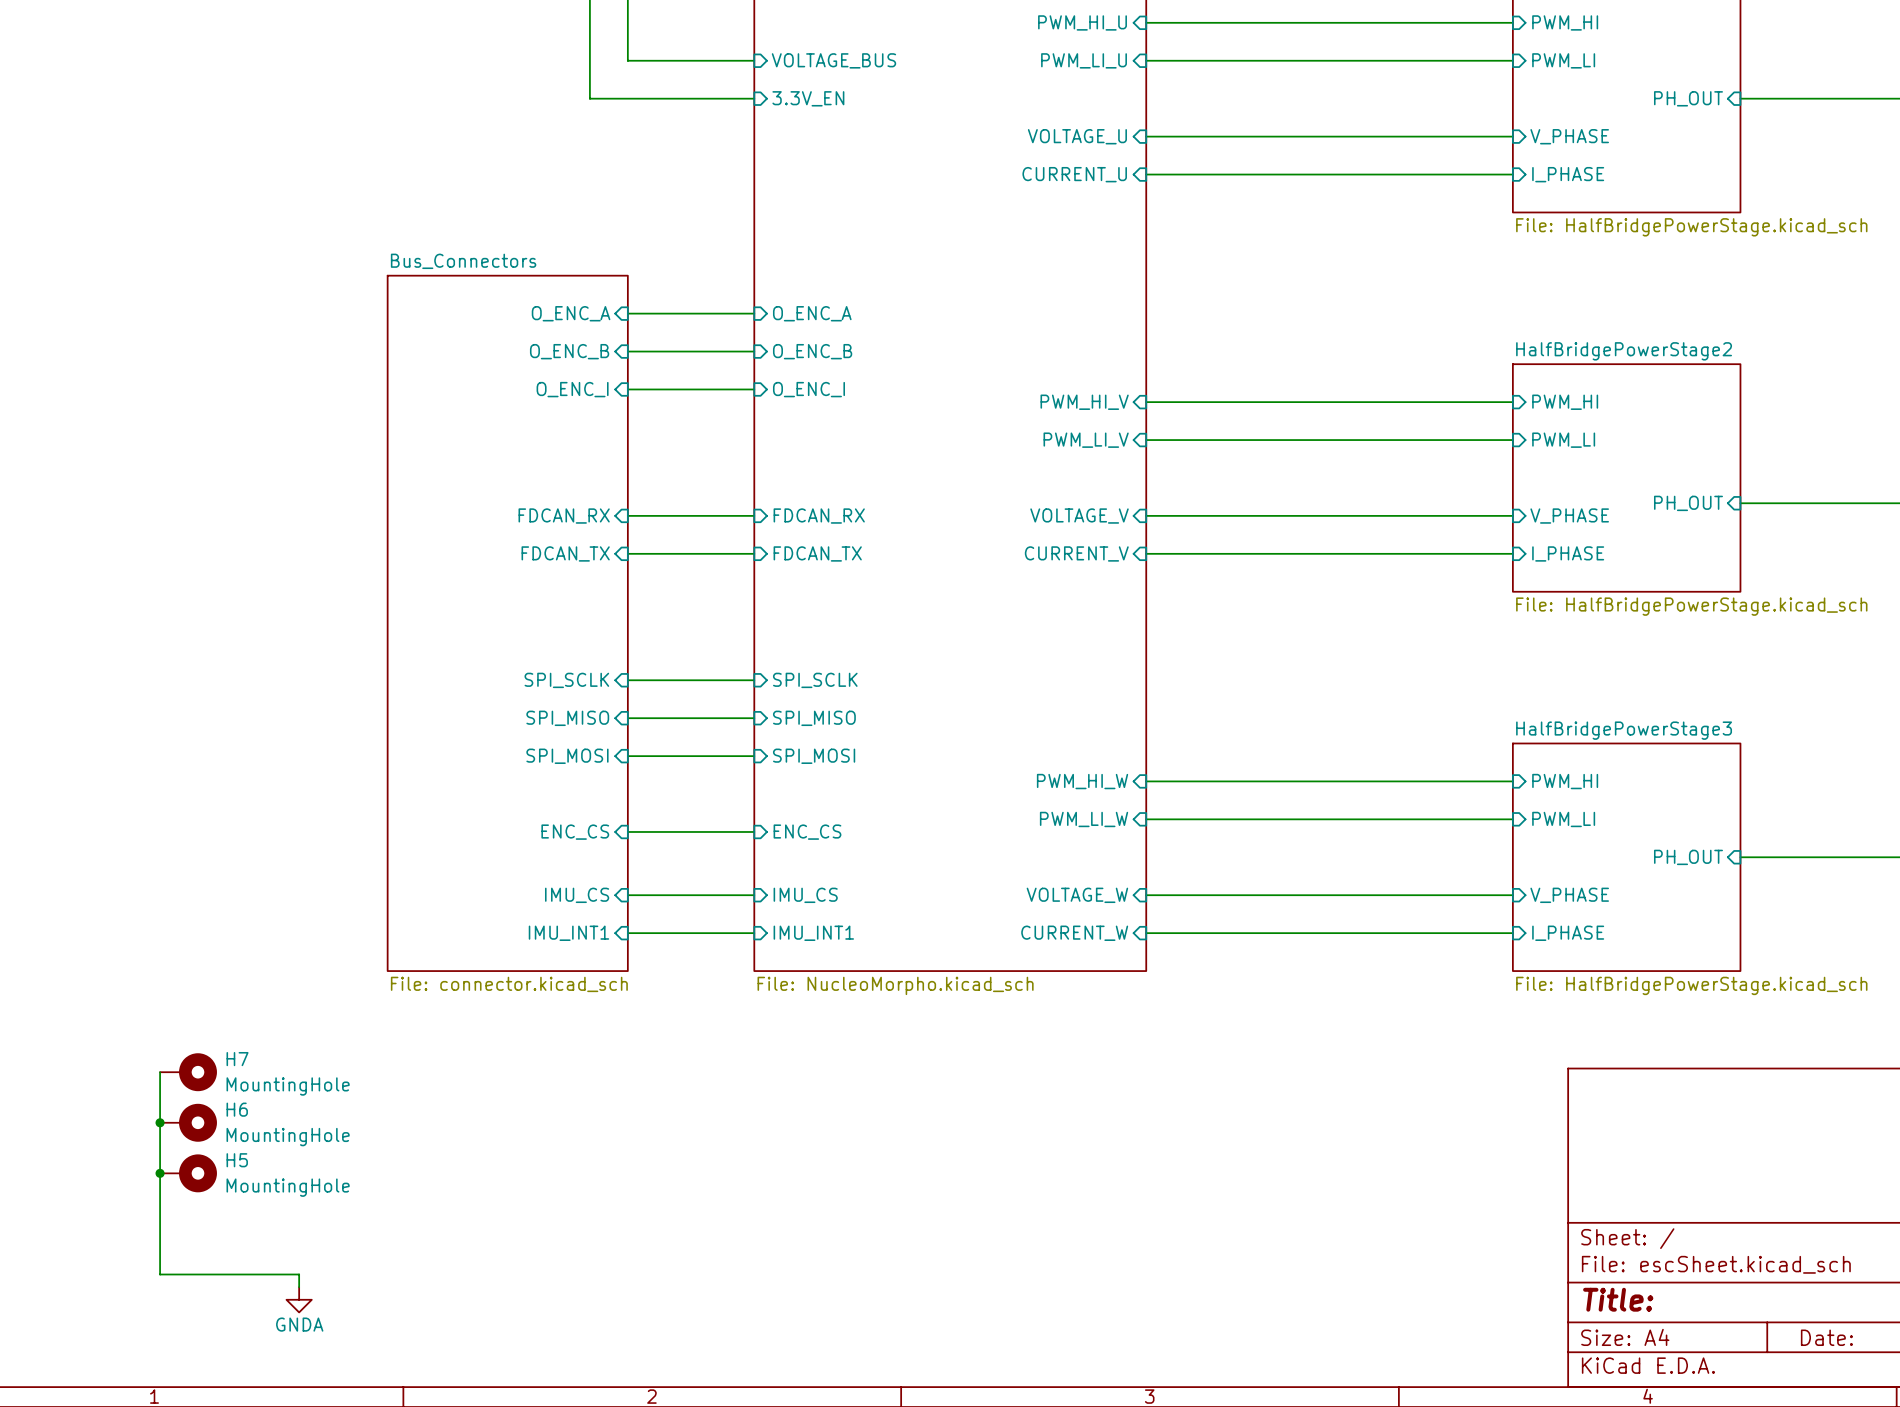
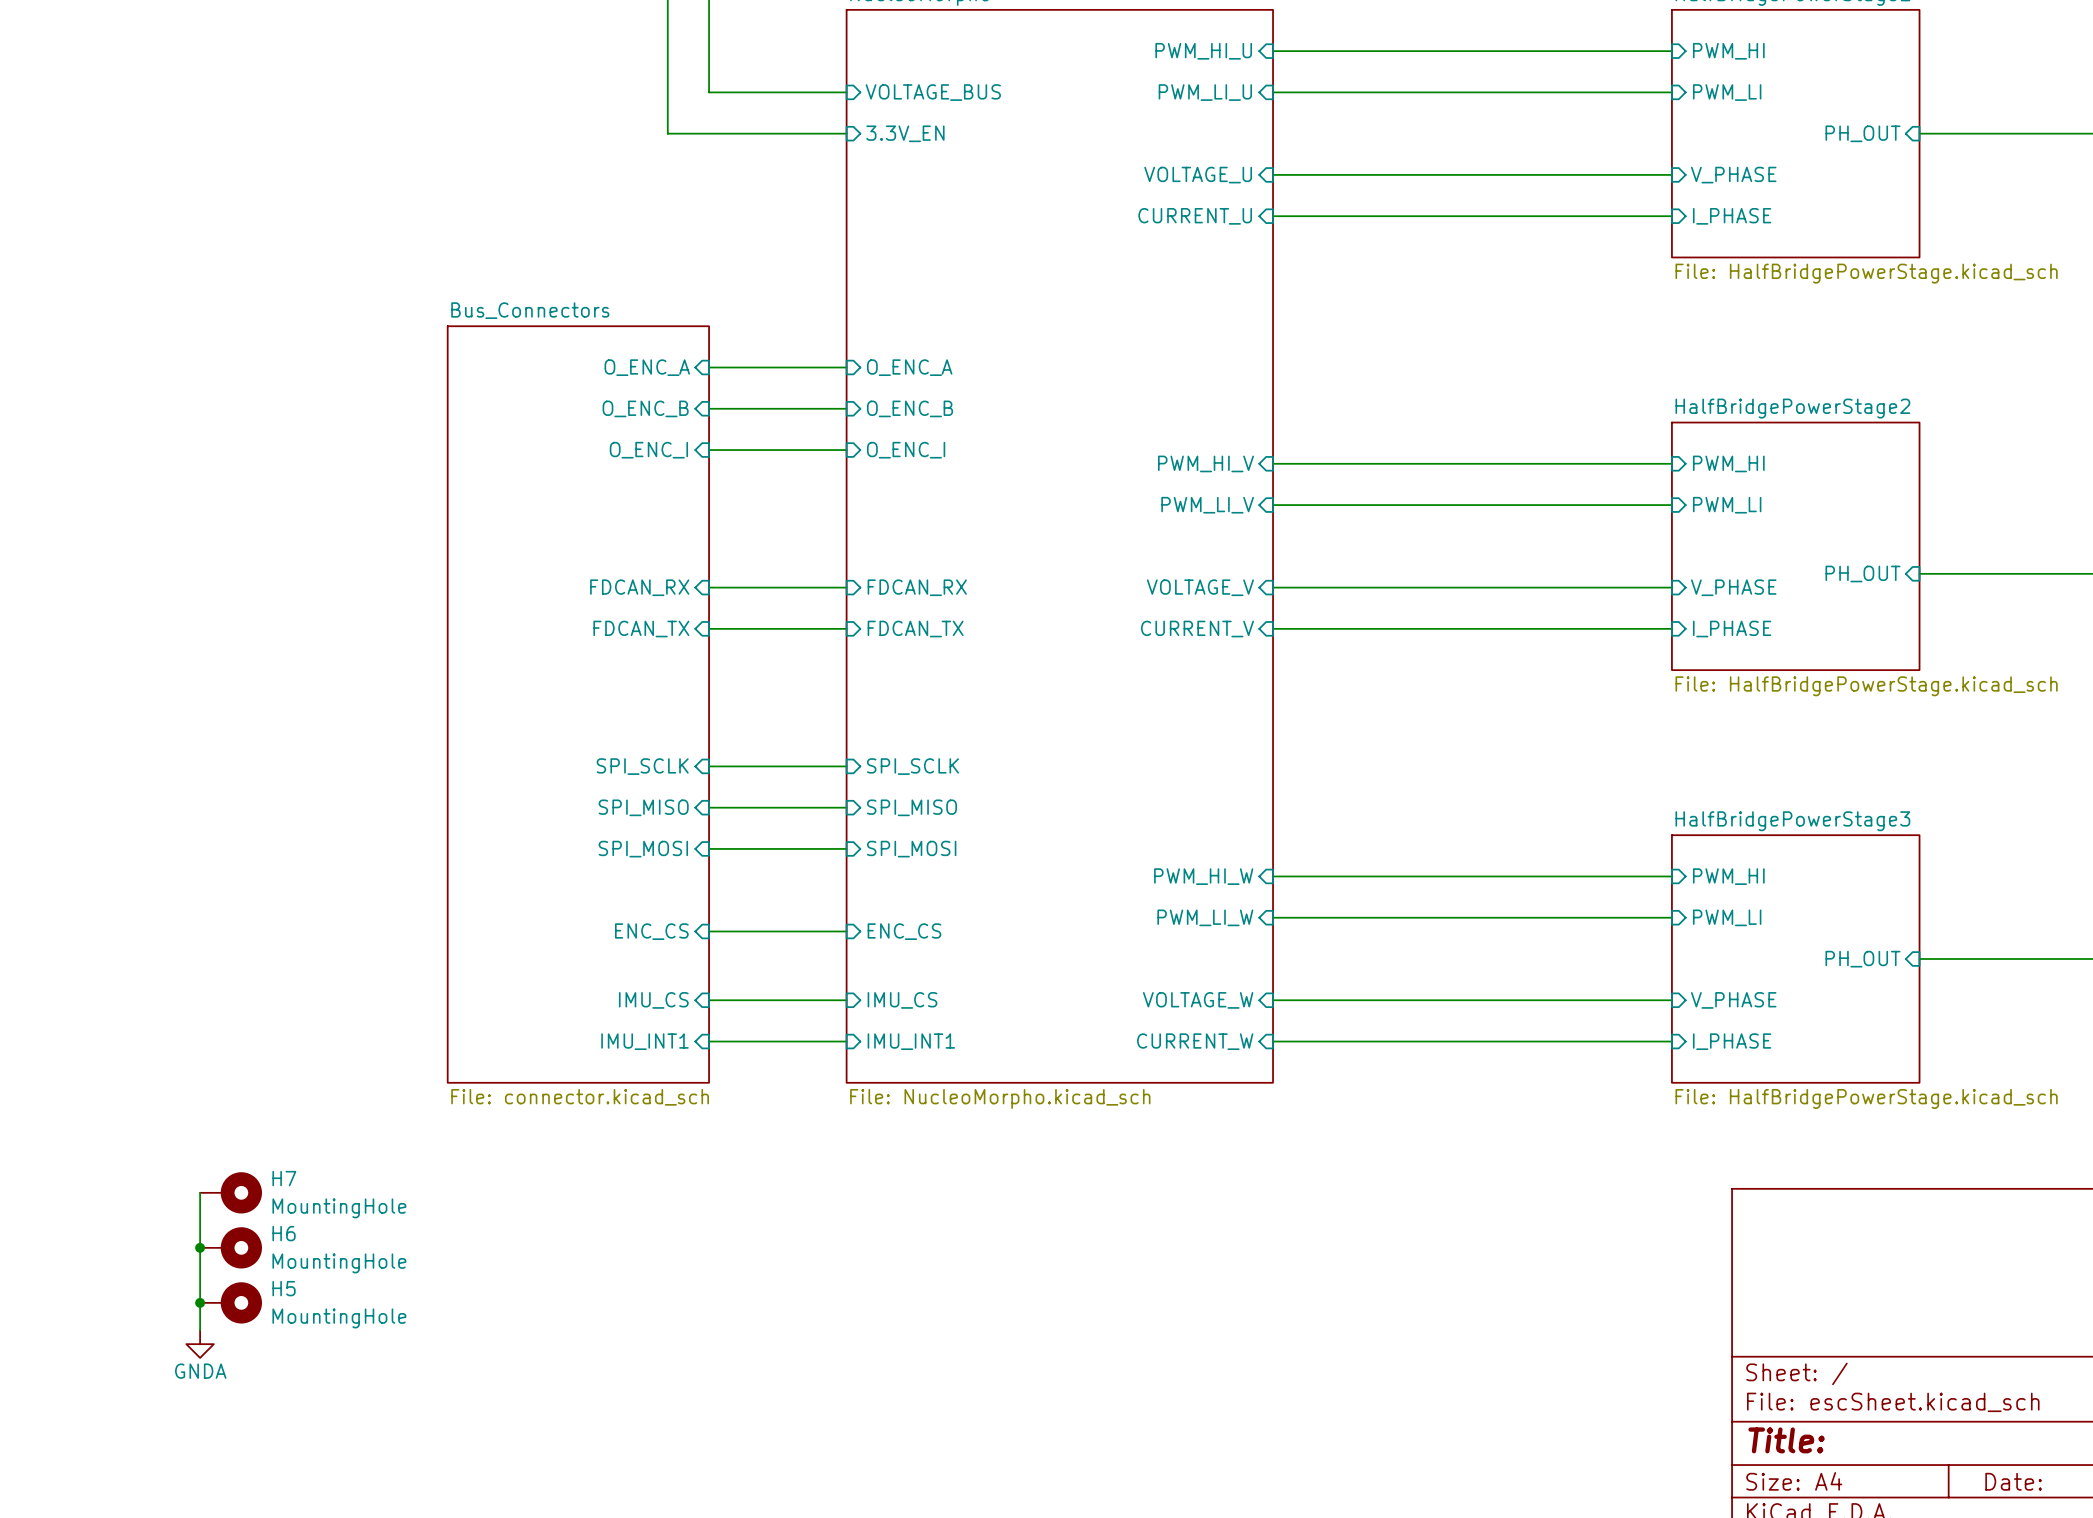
wire: (160, 1198) (160, 1274) (299, 1274) (299, 1287) -> none
power symbol position: GNDA (299, 1299) -> GNDA (200, 1344)

